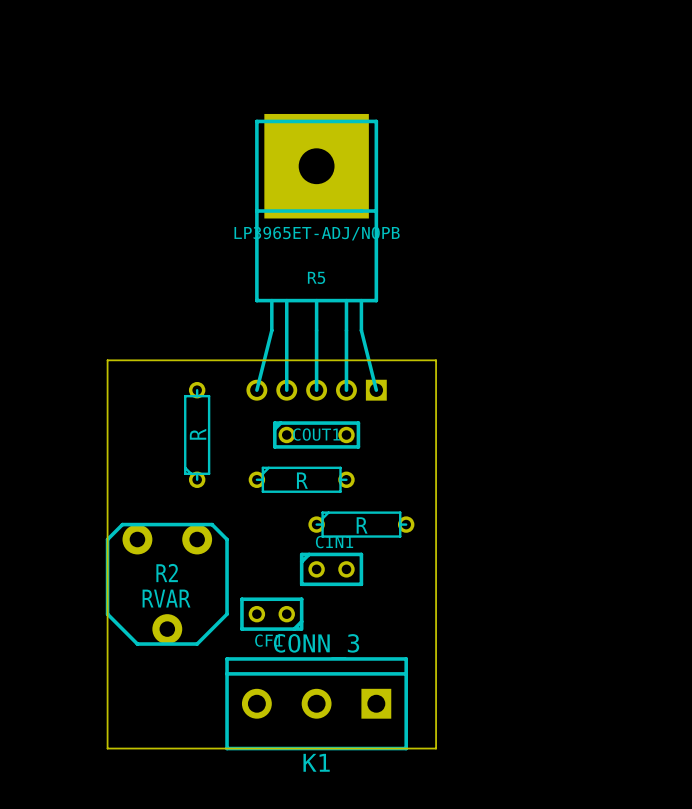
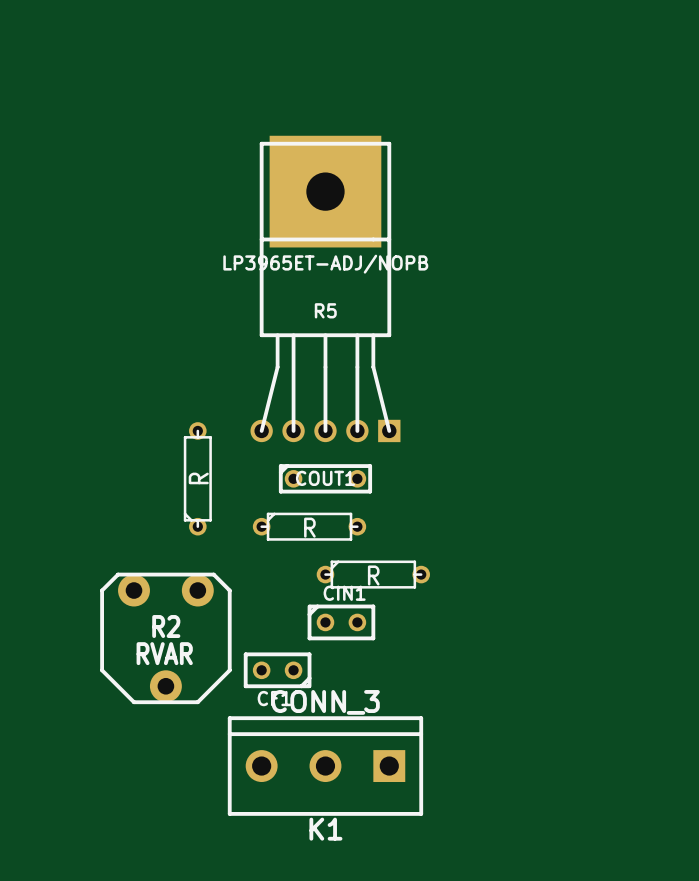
board edge: (107, 360) (436, 360) (436, 748) (107, 748) (107, 360) -> none

